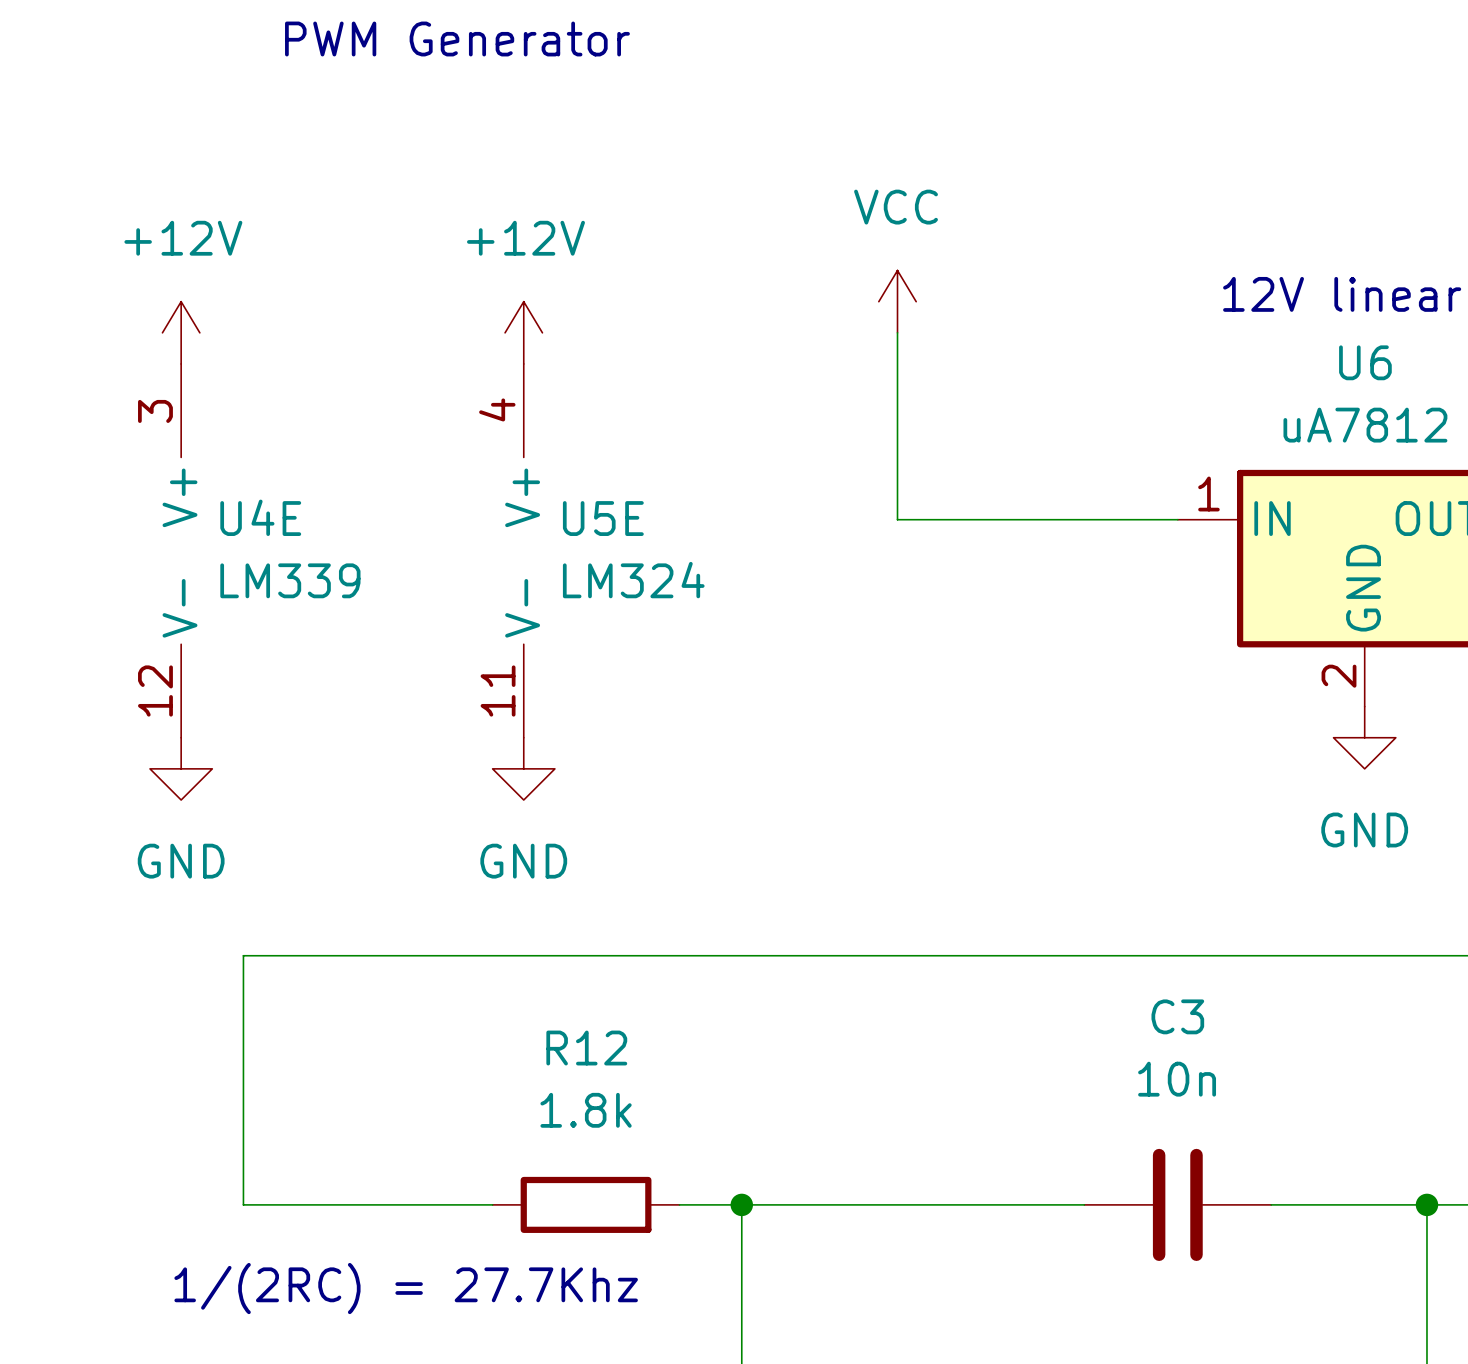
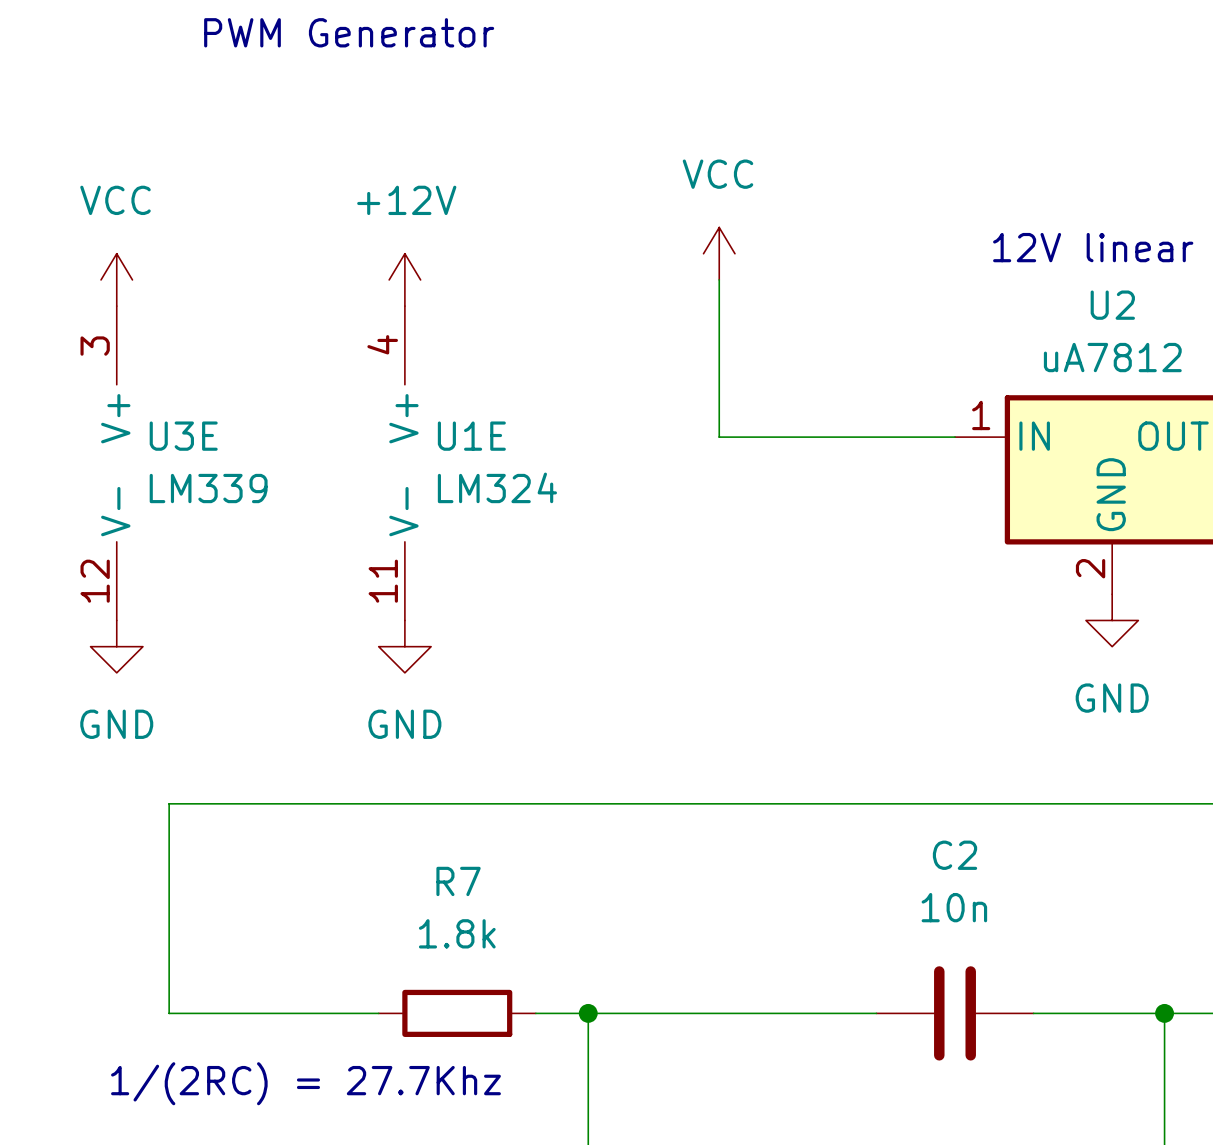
power symbol: +12V (181, 332) -> VCC (116, 279)
U6 name: U6 (1365, 362) -> U2 (1112, 305)
U4E name: U4E (260, 517) -> U3E (183, 436)
U5E name: U5E (603, 518) -> U1E (471, 436)
C3 name: C3 (1177, 1016) -> C2 (955, 855)
R12 name: R12 (586, 1048) -> R7 (458, 881)

